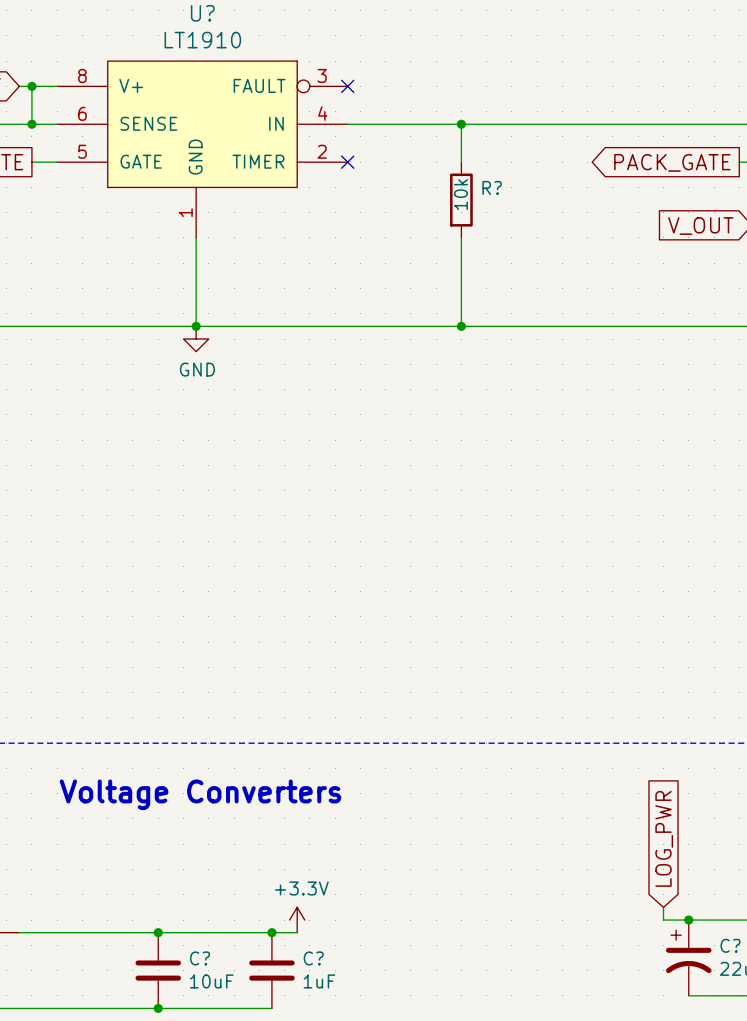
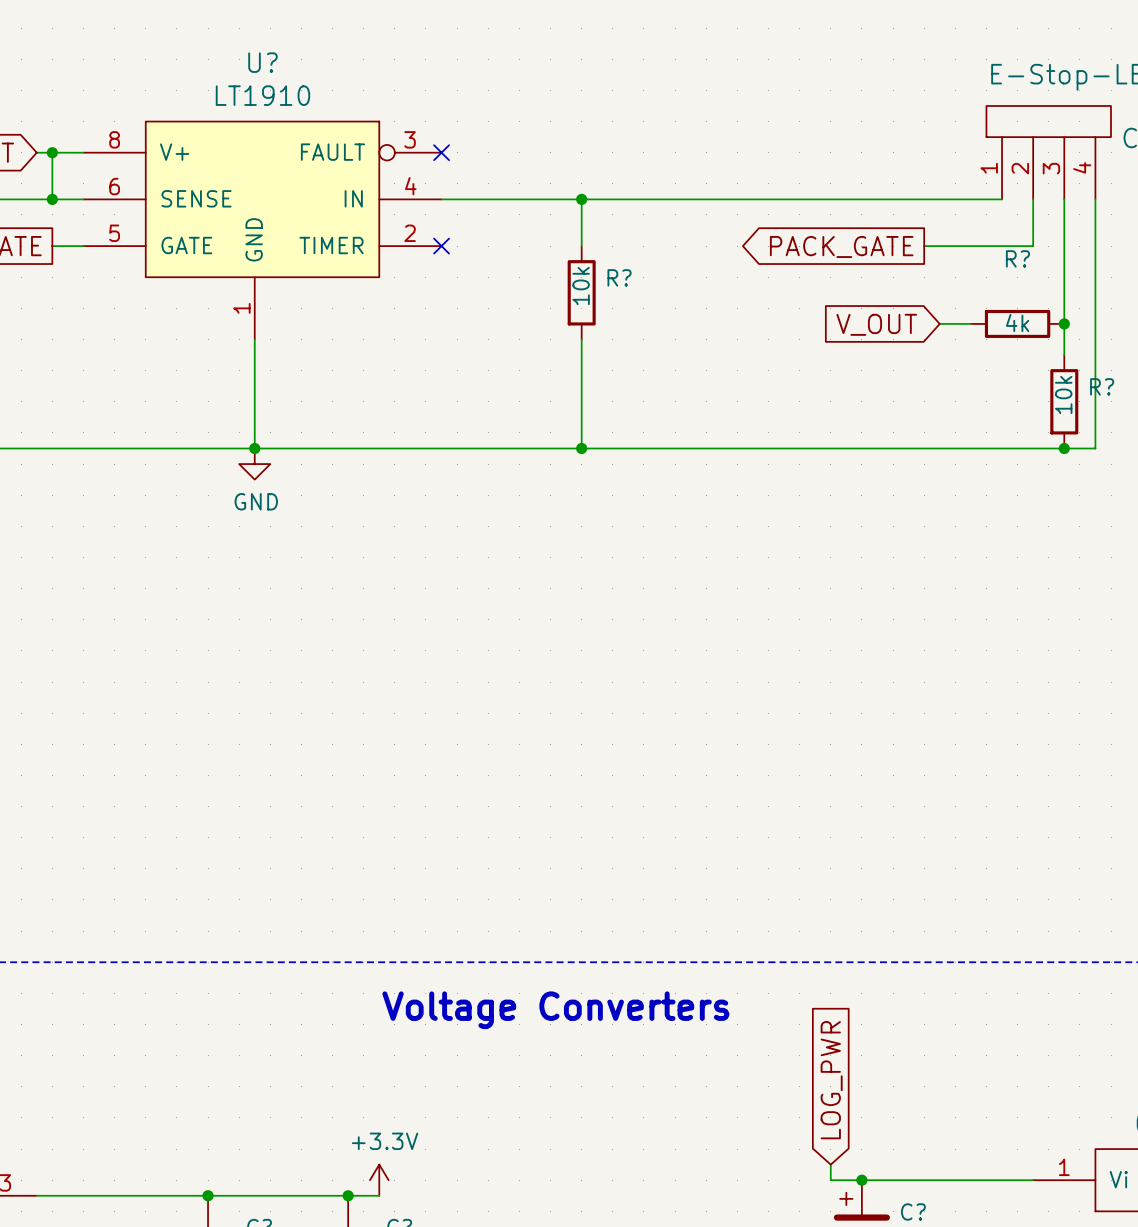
text position: Voltage Converters (200, 794) -> Voltage Converters (555, 1010)

